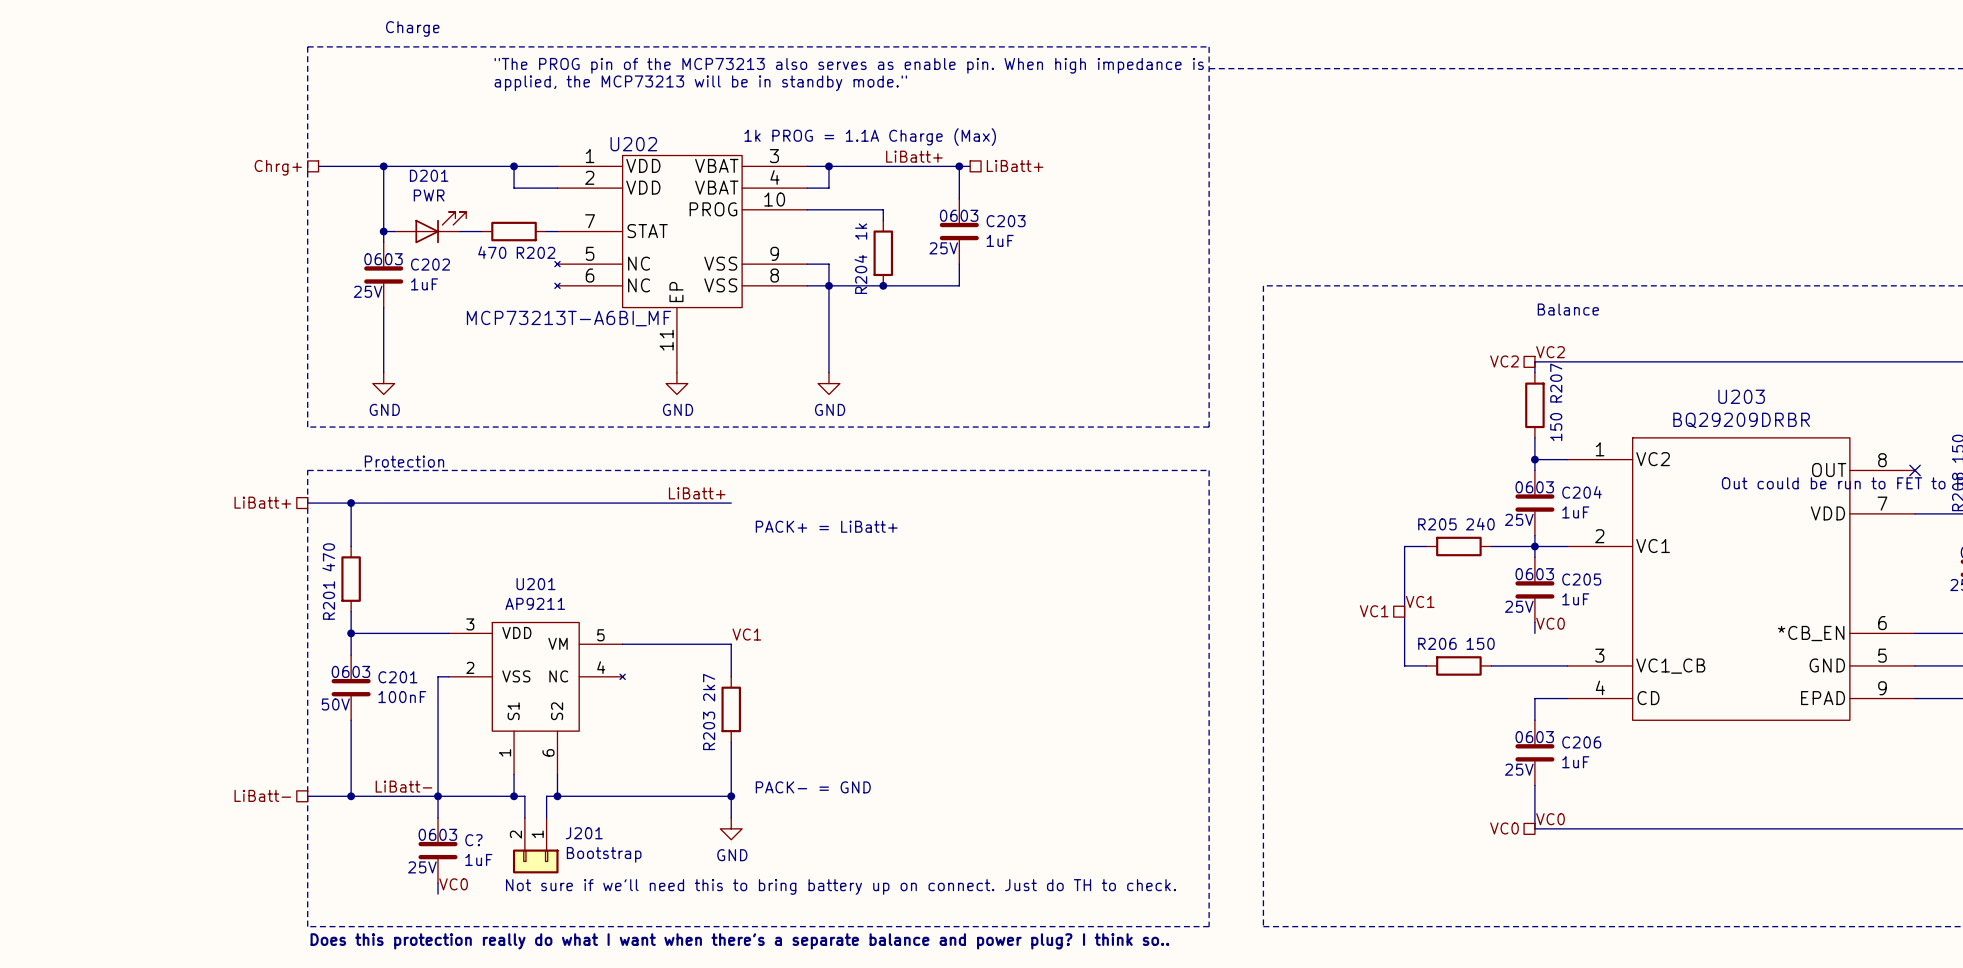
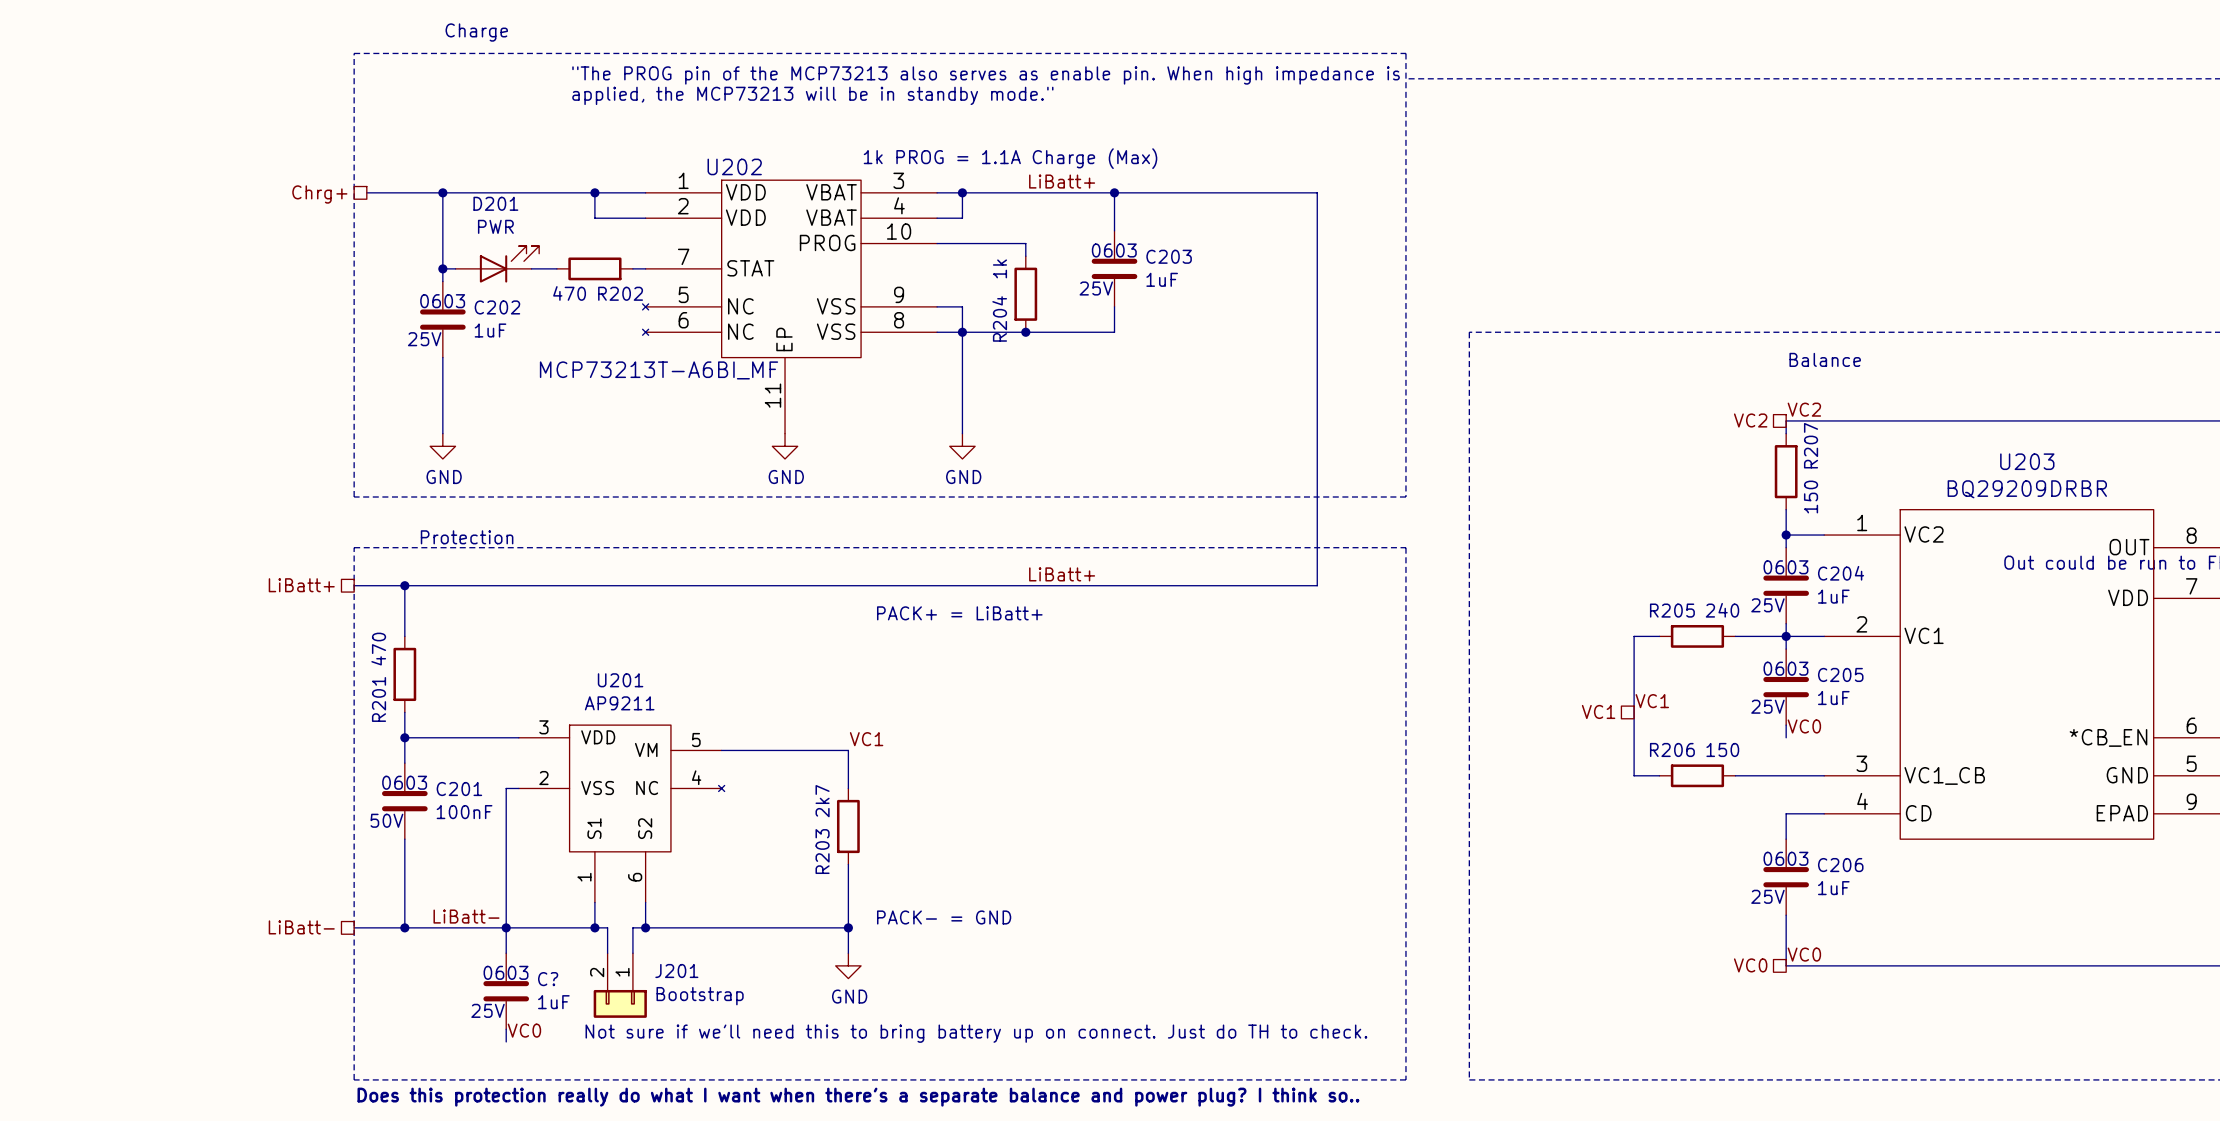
hierarchical label: LiBatt+ (1015, 165) -> none
wire: none -> (1127, 192) (1317, 192) (1317, 585) (848, 585)
label: LiBatt+ (697, 493) -> none
label: none -> LiBatt+ (1062, 574)

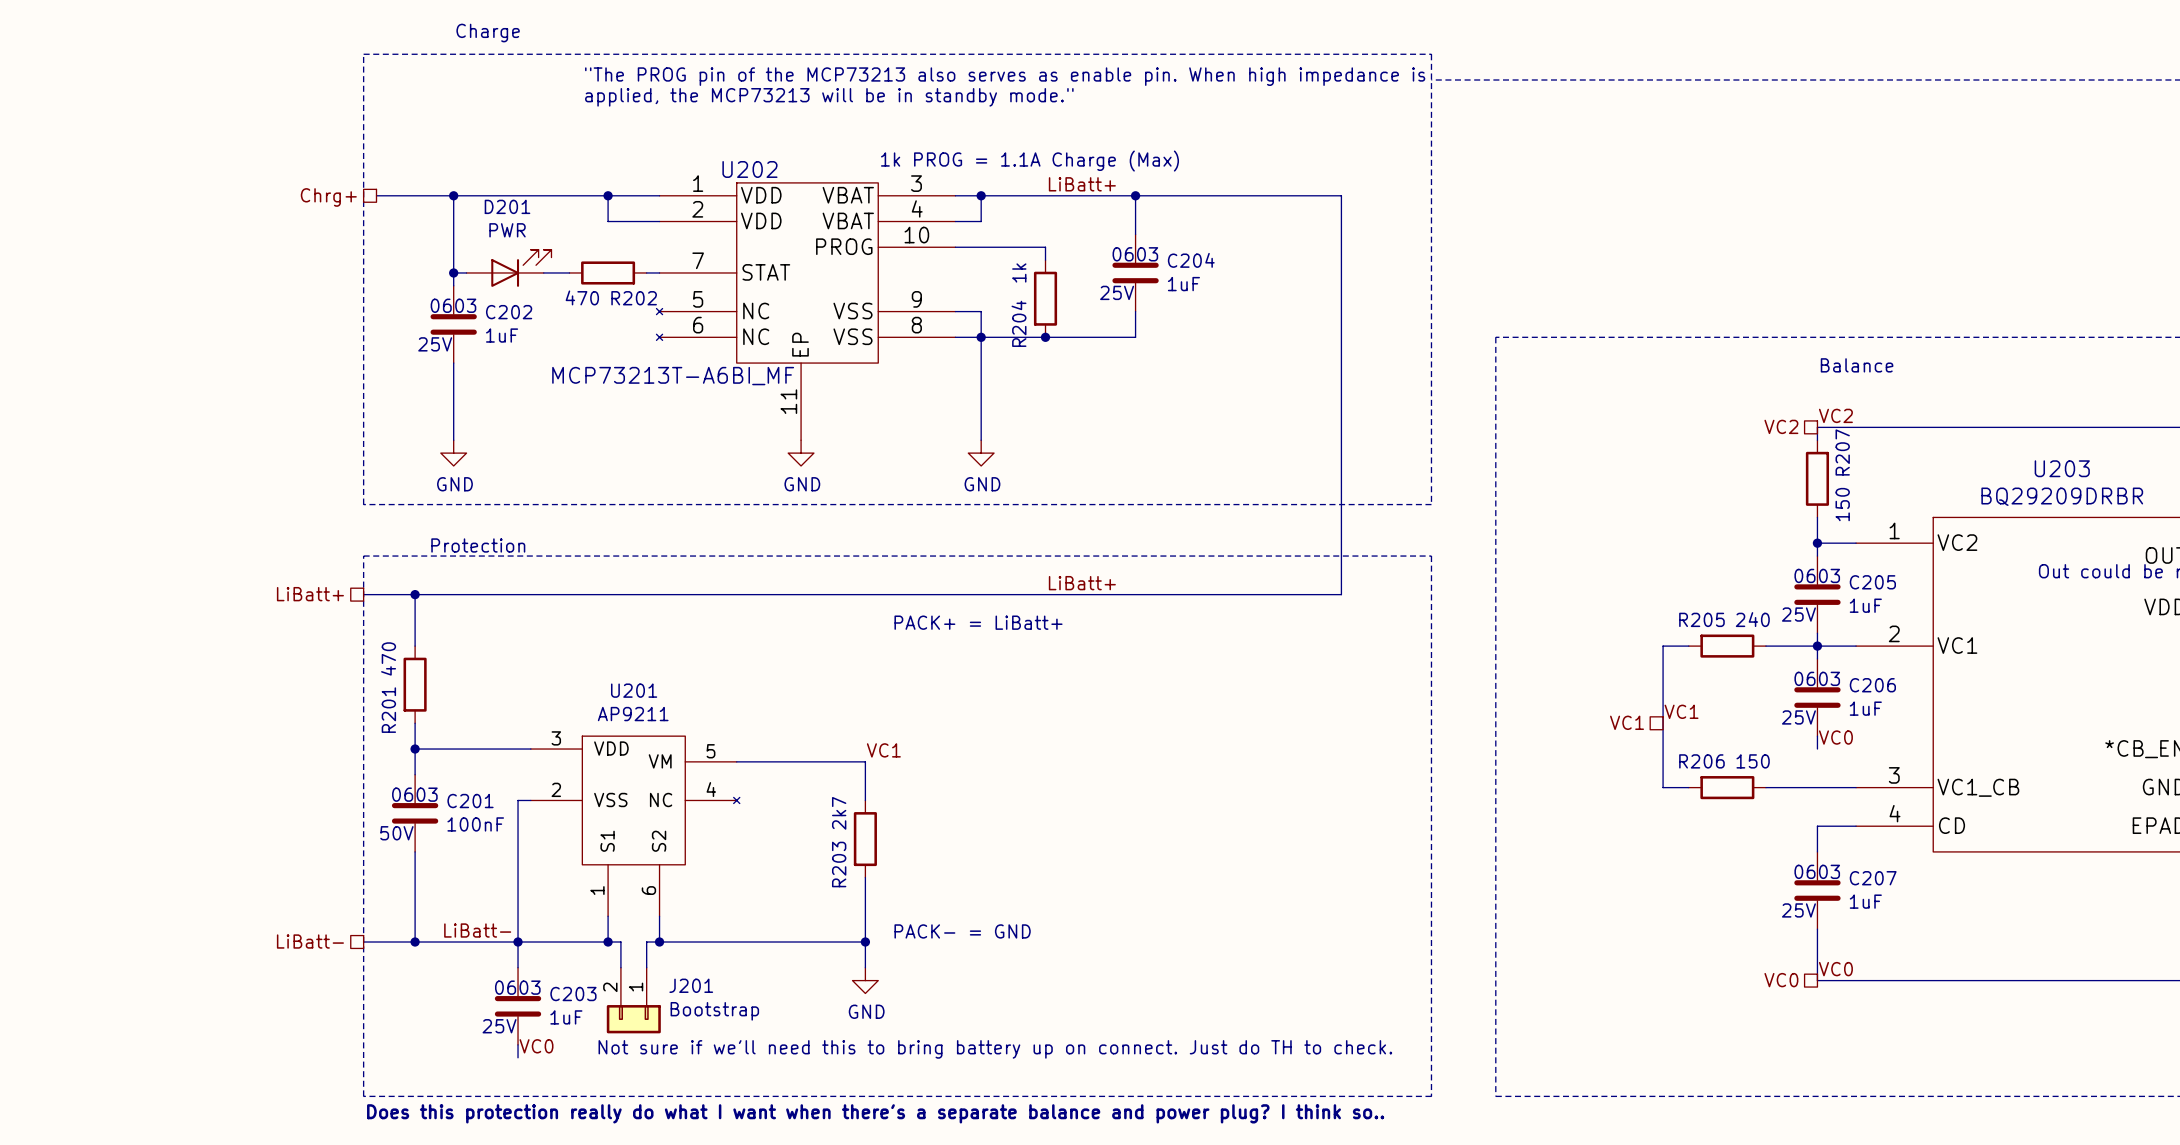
C203 name: C203 (1169, 256) -> C204 (1191, 260)
C204 name: C204 (1841, 573) -> C205 (1872, 582)
C205 name: C205 (1840, 674) -> C206 (1872, 685)
C206 name: C206 (1840, 865) -> C207 (1873, 878)
C? name: C? (548, 979) -> C203 (573, 994)

